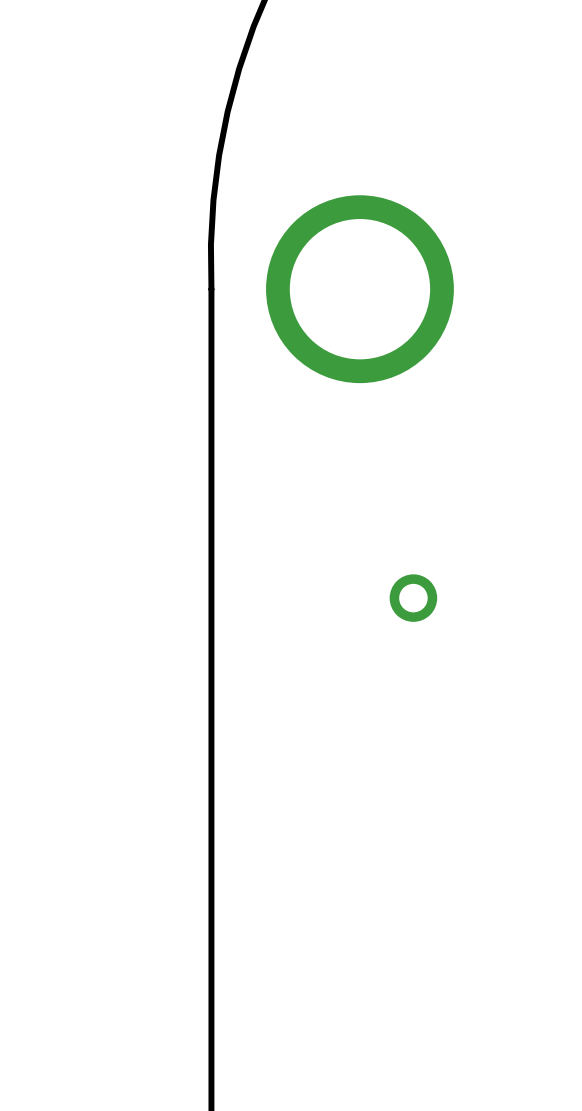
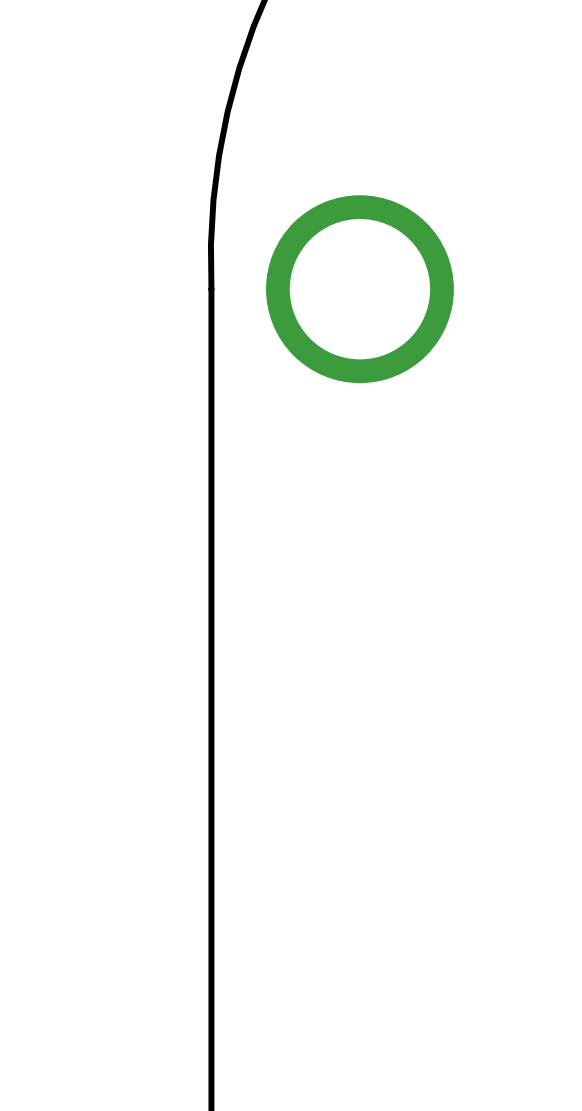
via: (413, 598) -> none

